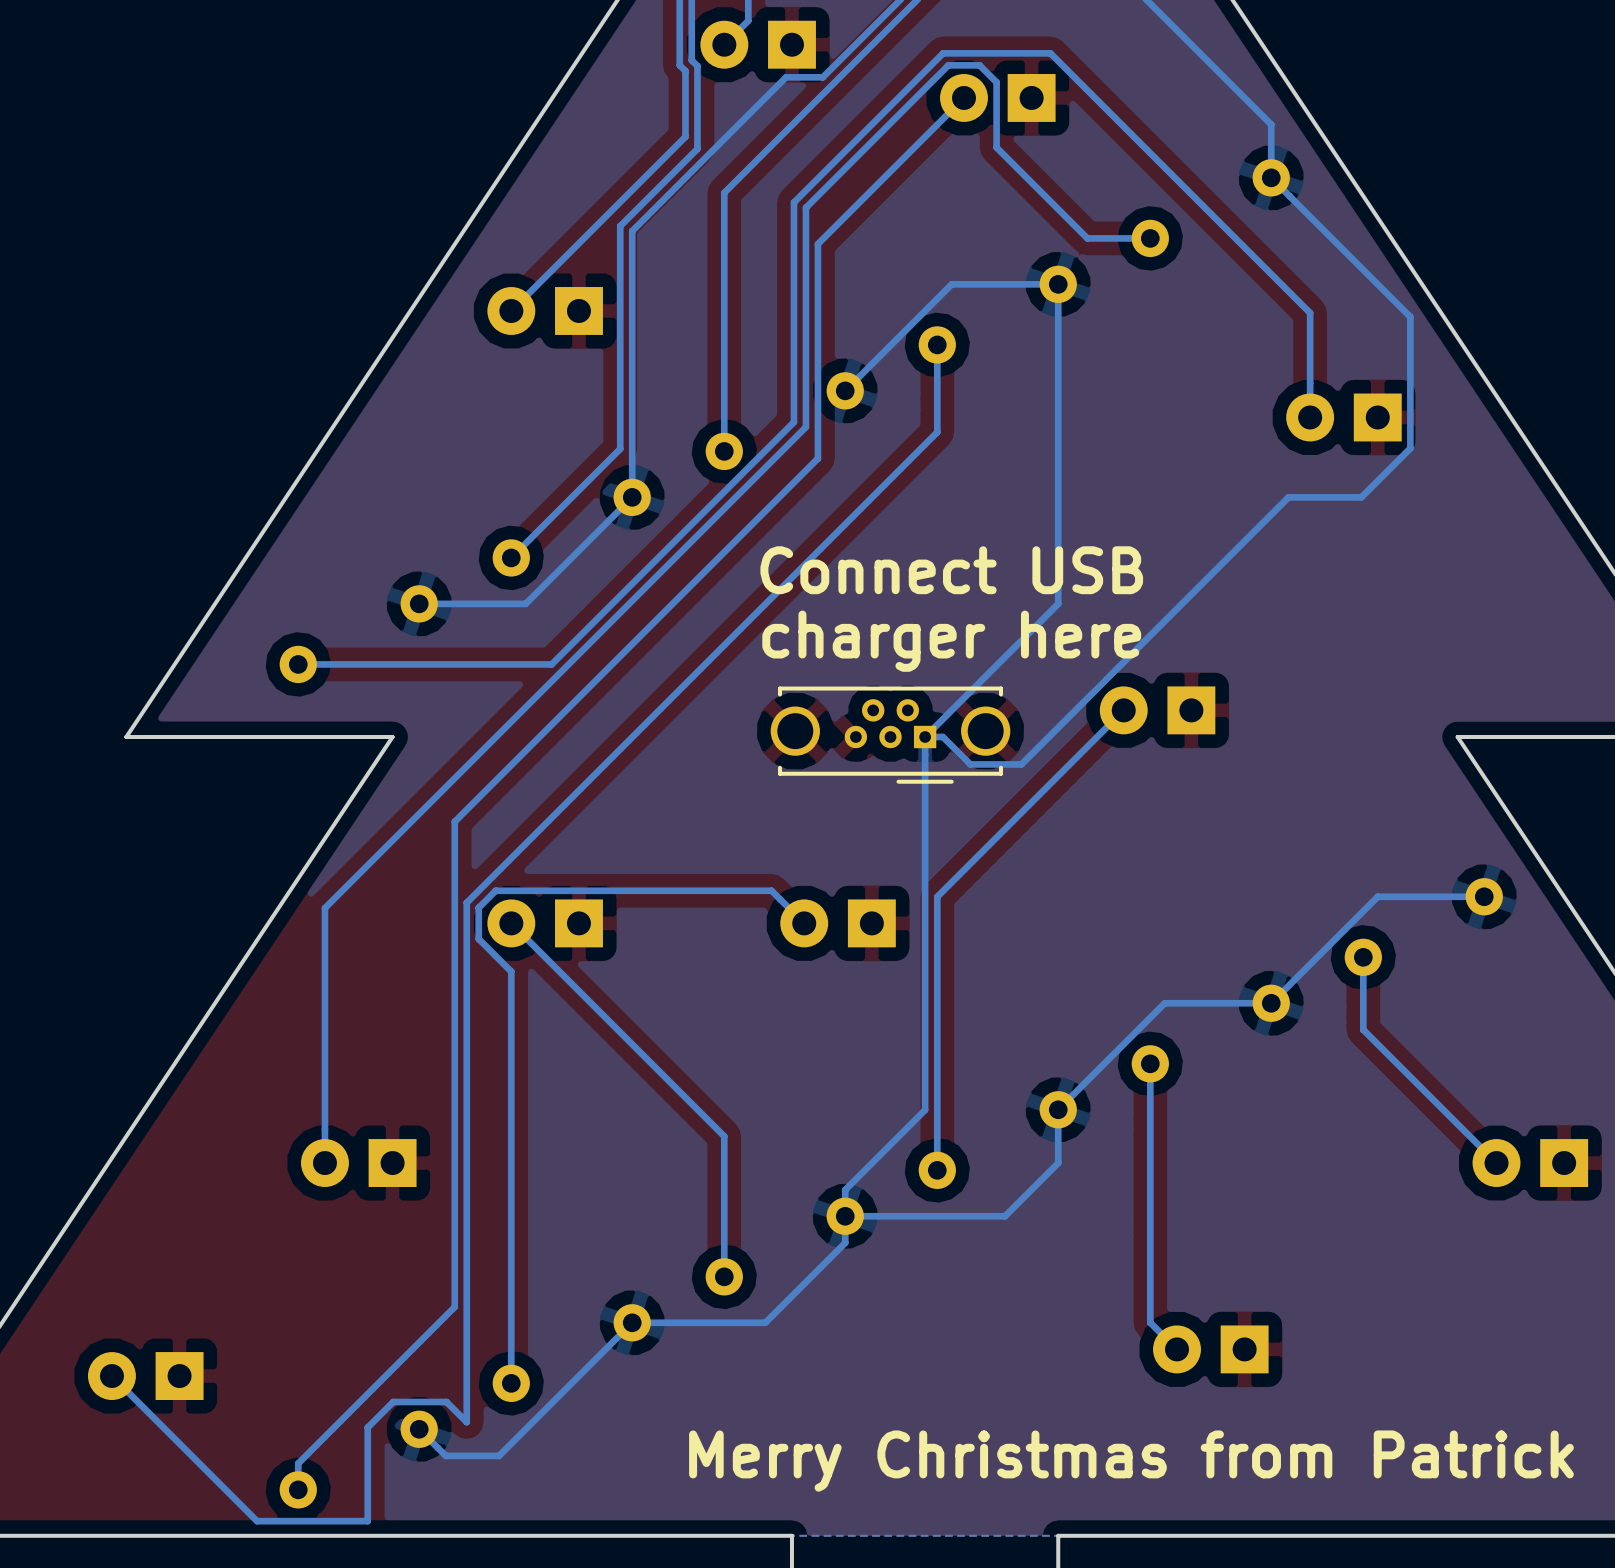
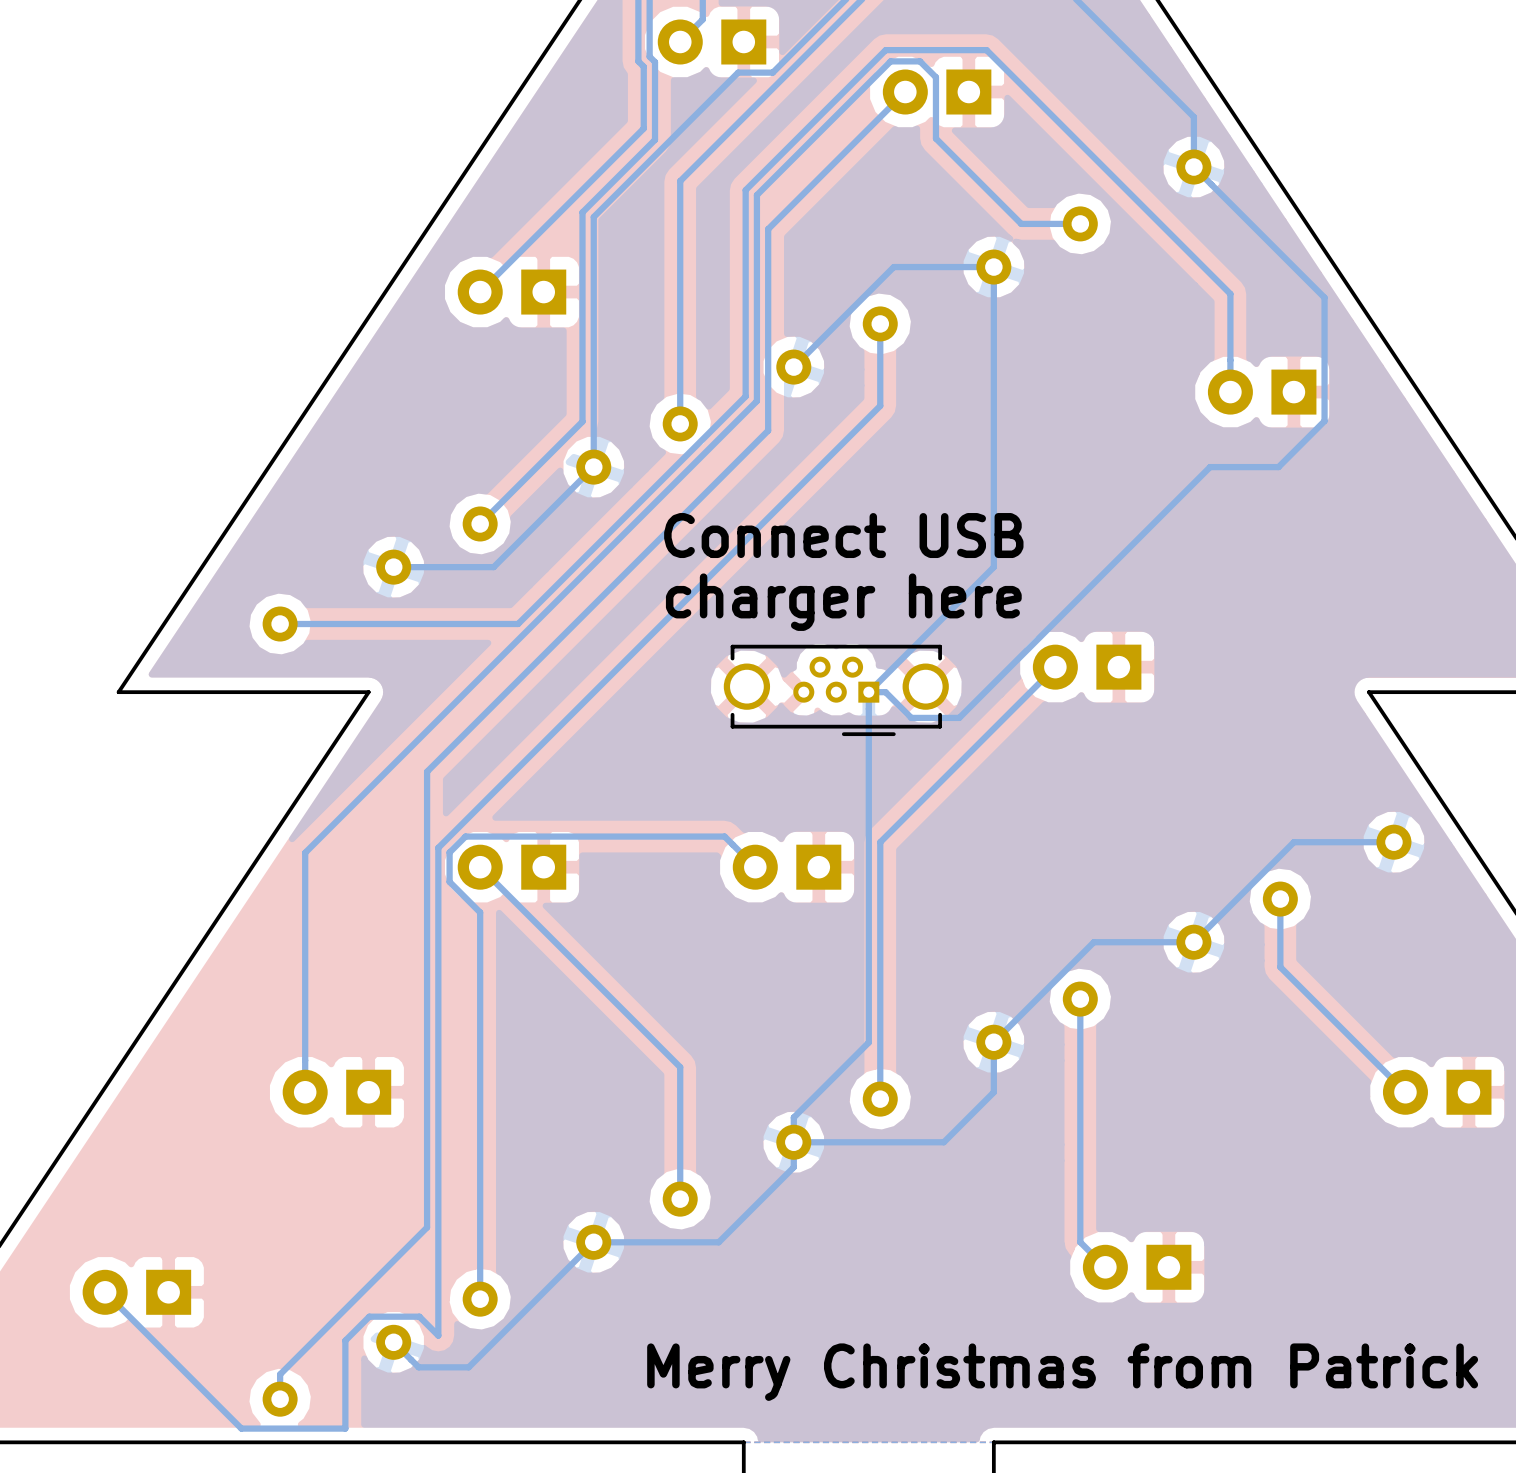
text position: Connect USB (951, 570) -> Connect USB (843, 535)
text position: charger here (951, 641) -> charger here (843, 602)
part footprint: [770, 686, 1011, 784] -> [723, 644, 949, 737]

